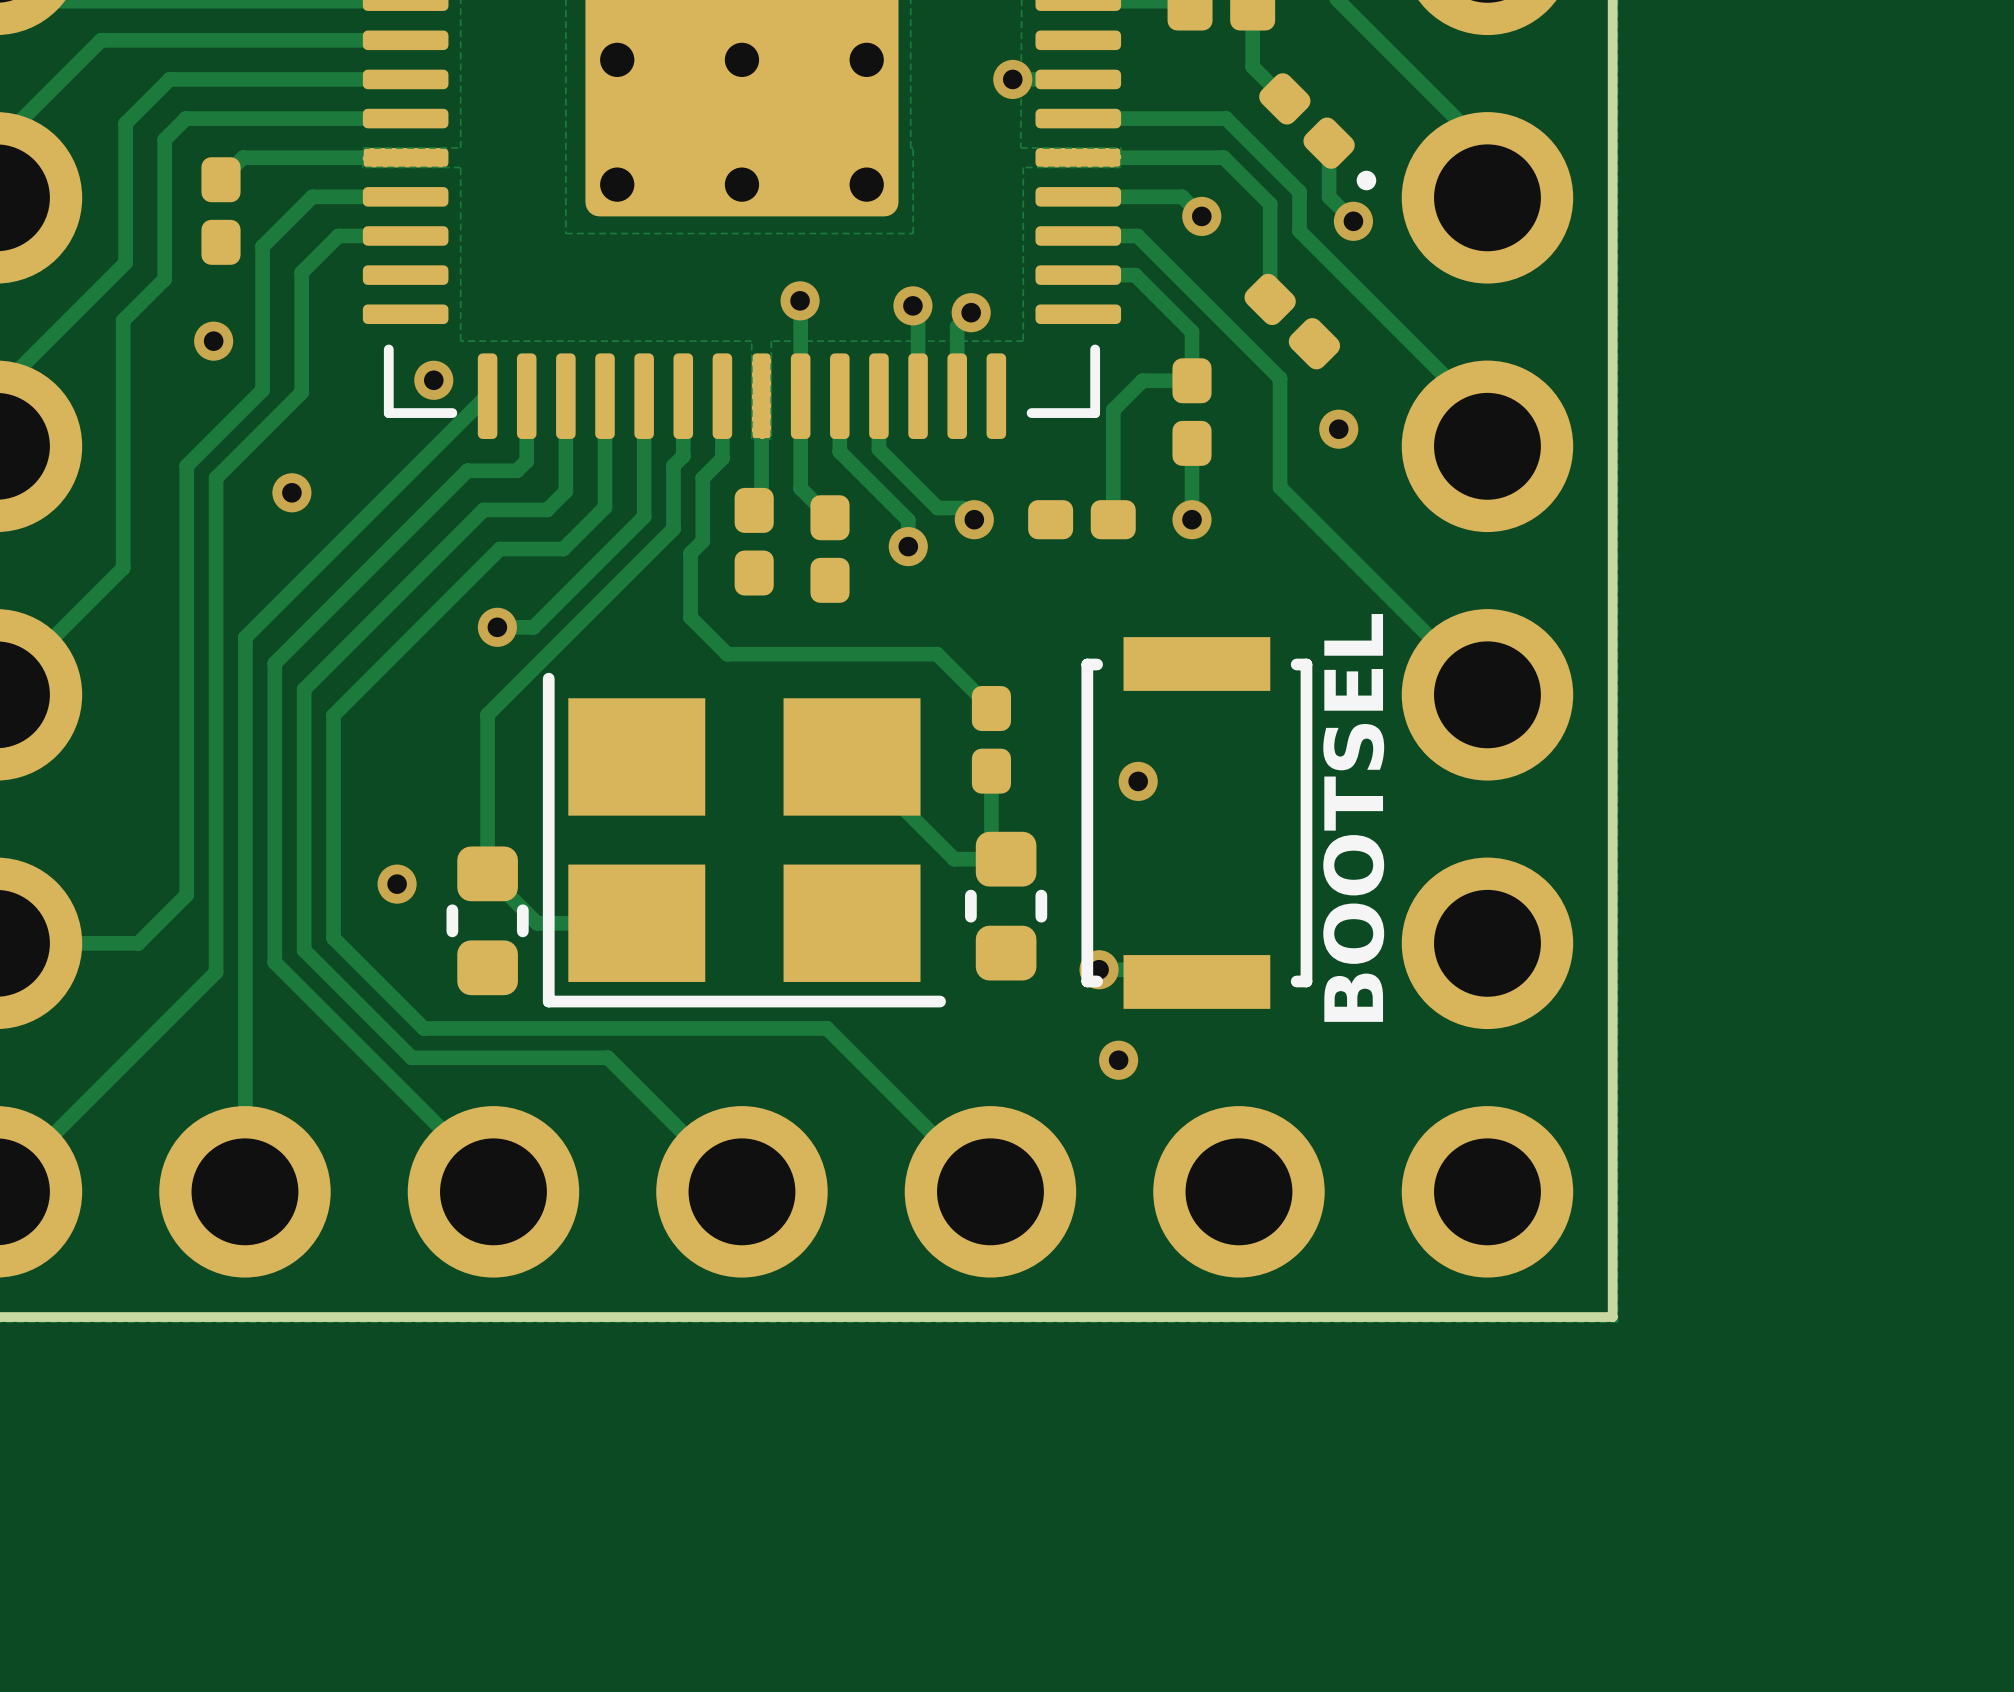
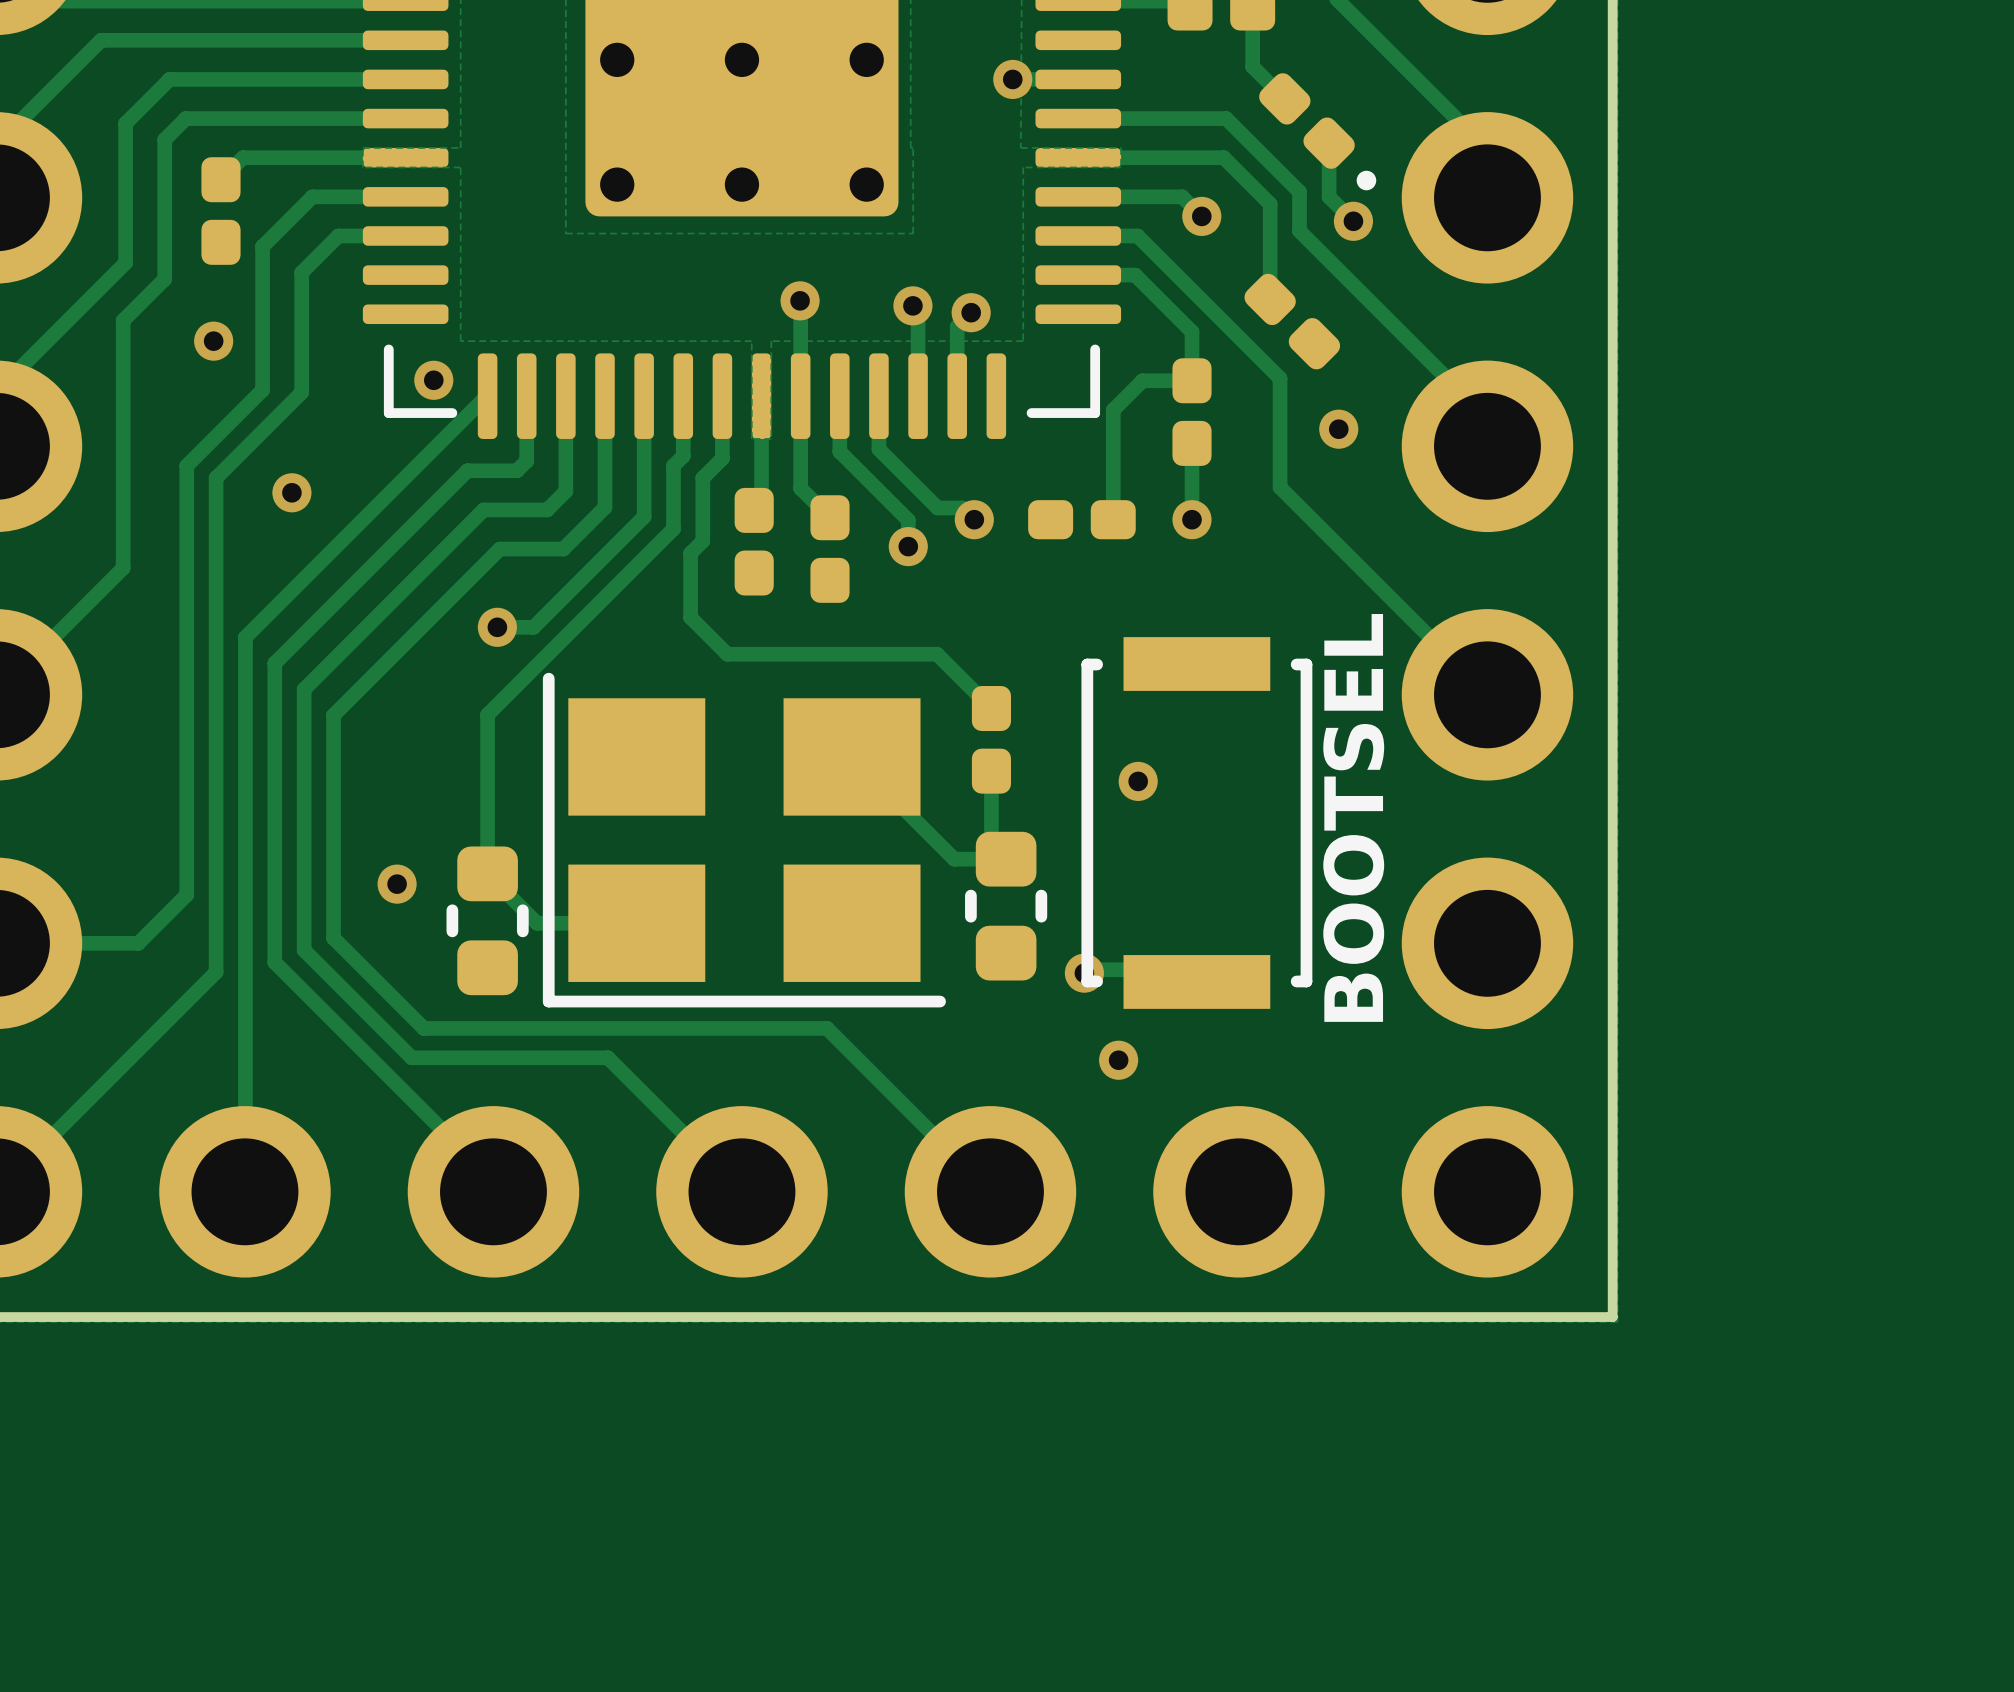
via position: (1099, 969) -> (1084, 973)

